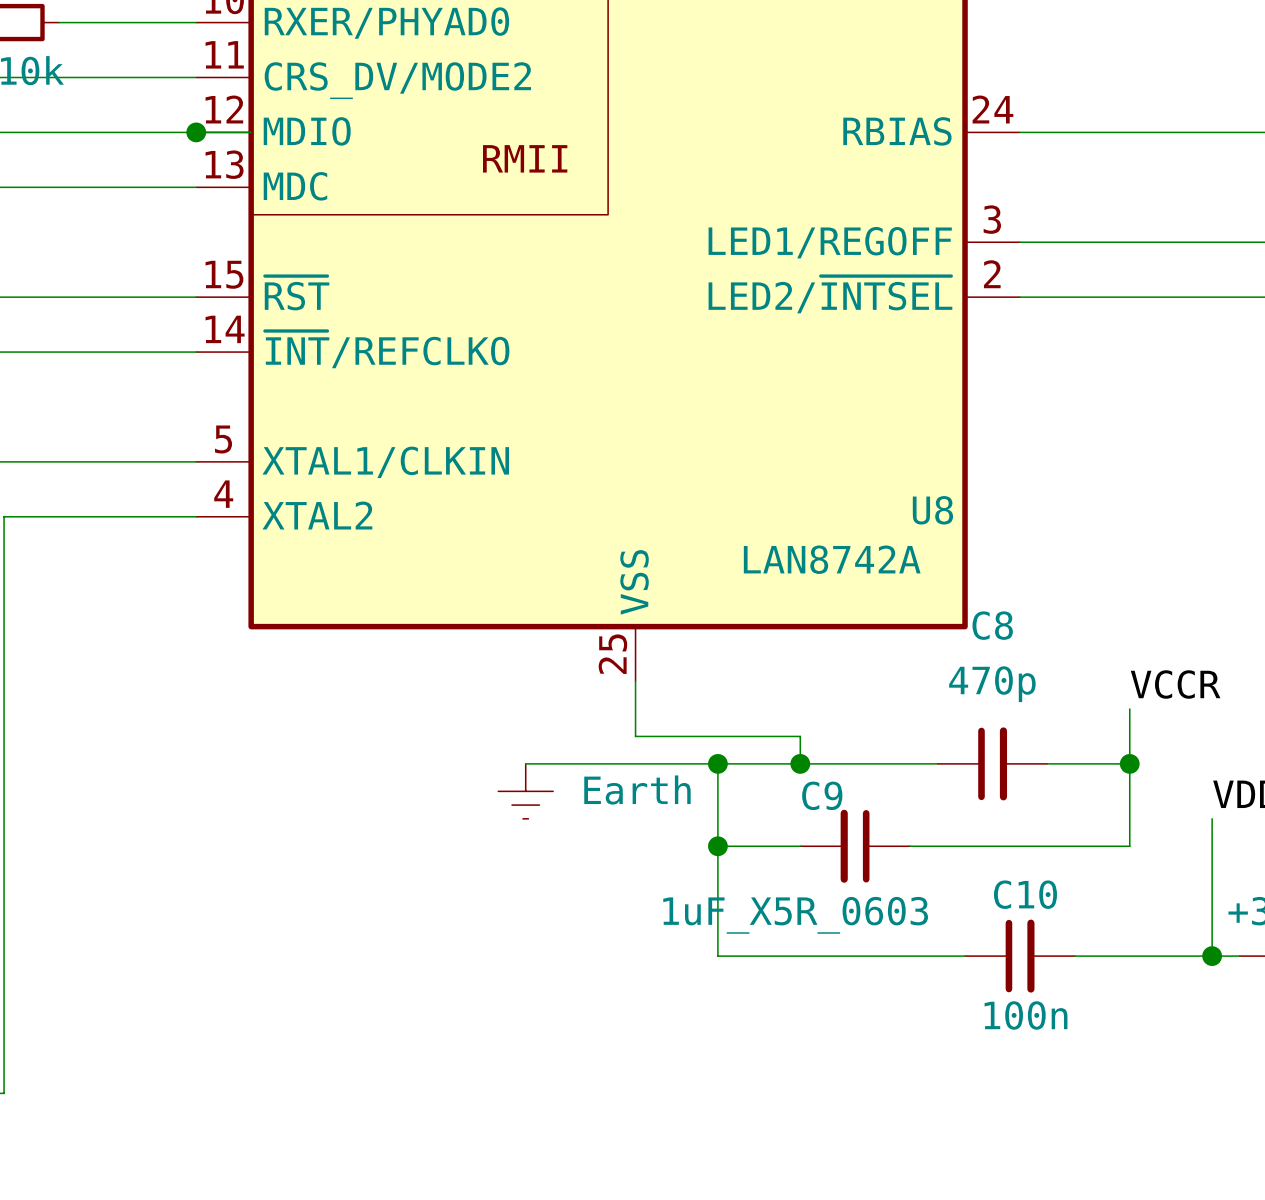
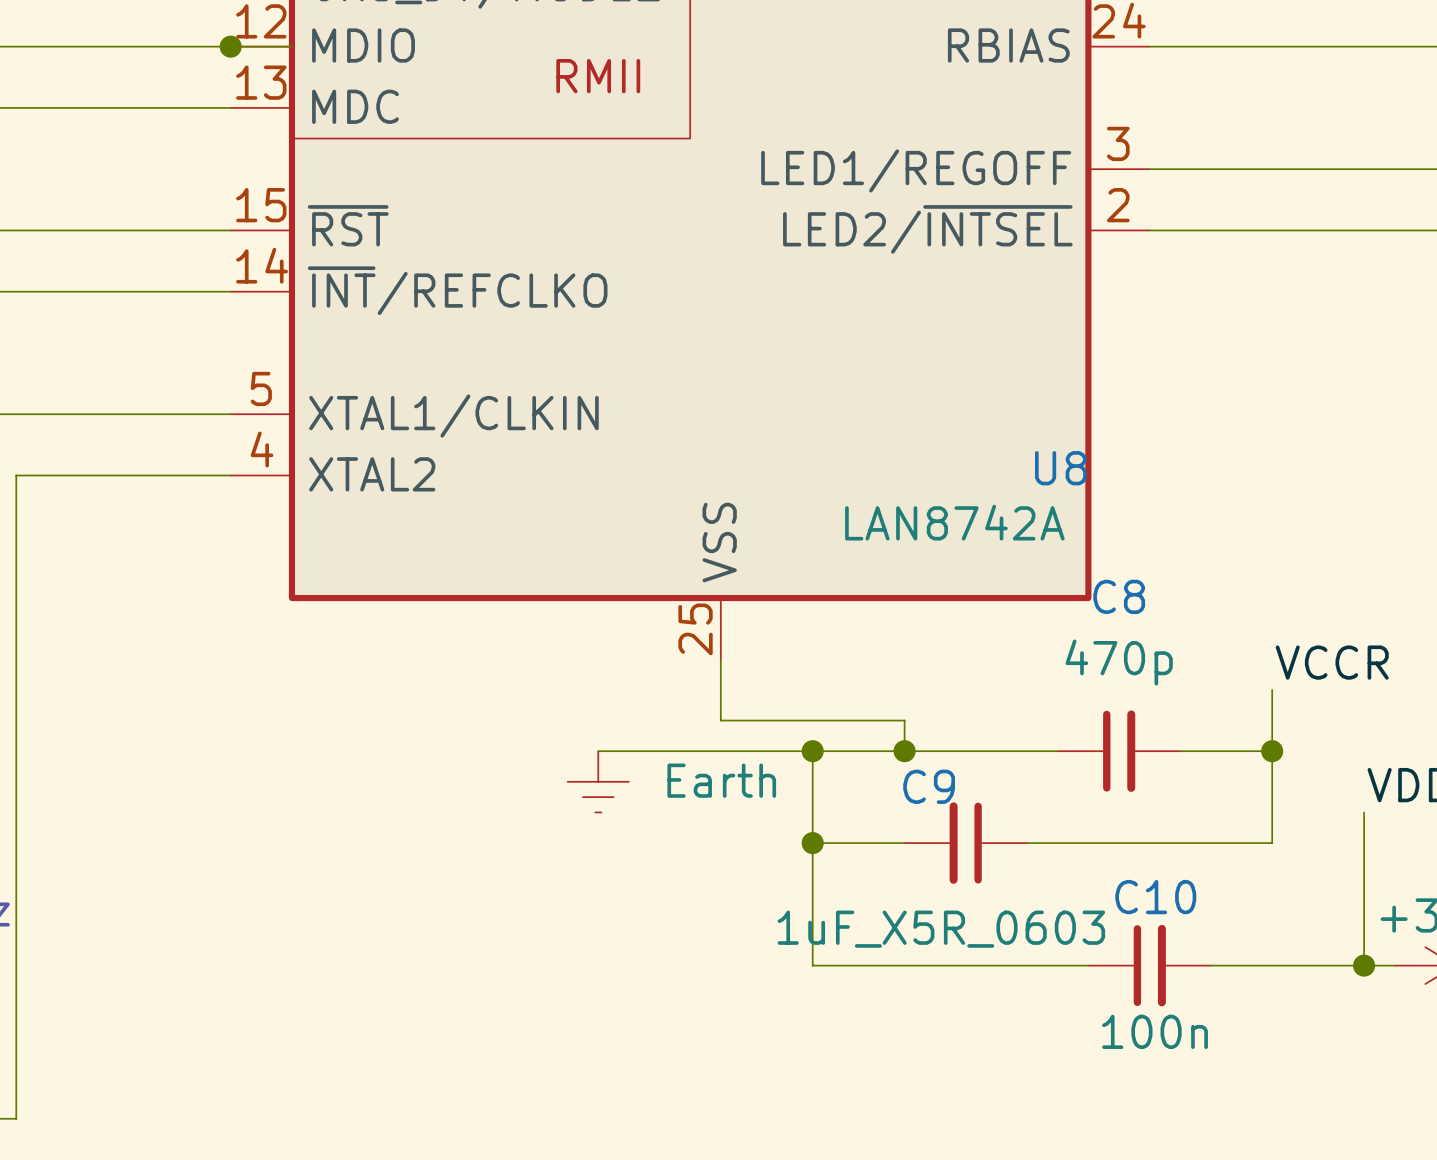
C9 value position: 1uF_X5R_0603 (795, 915) -> 1uF_X5R_0603 (941, 929)

